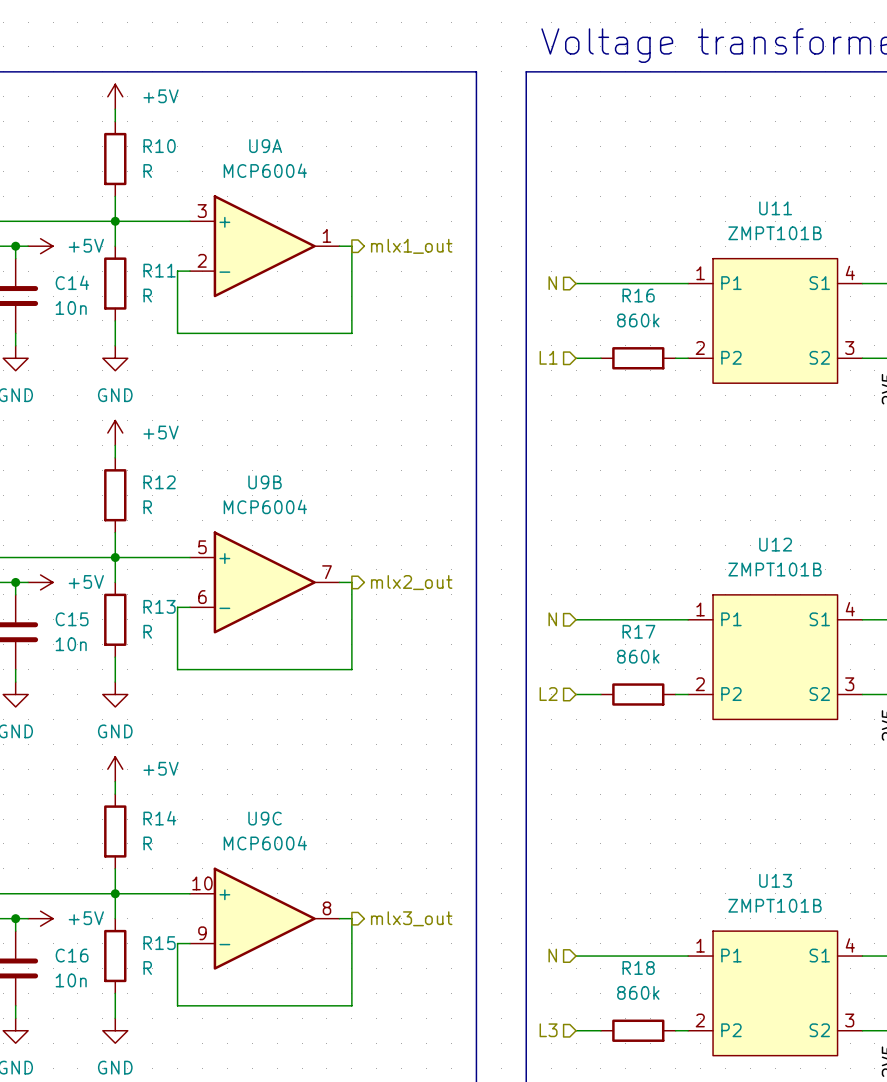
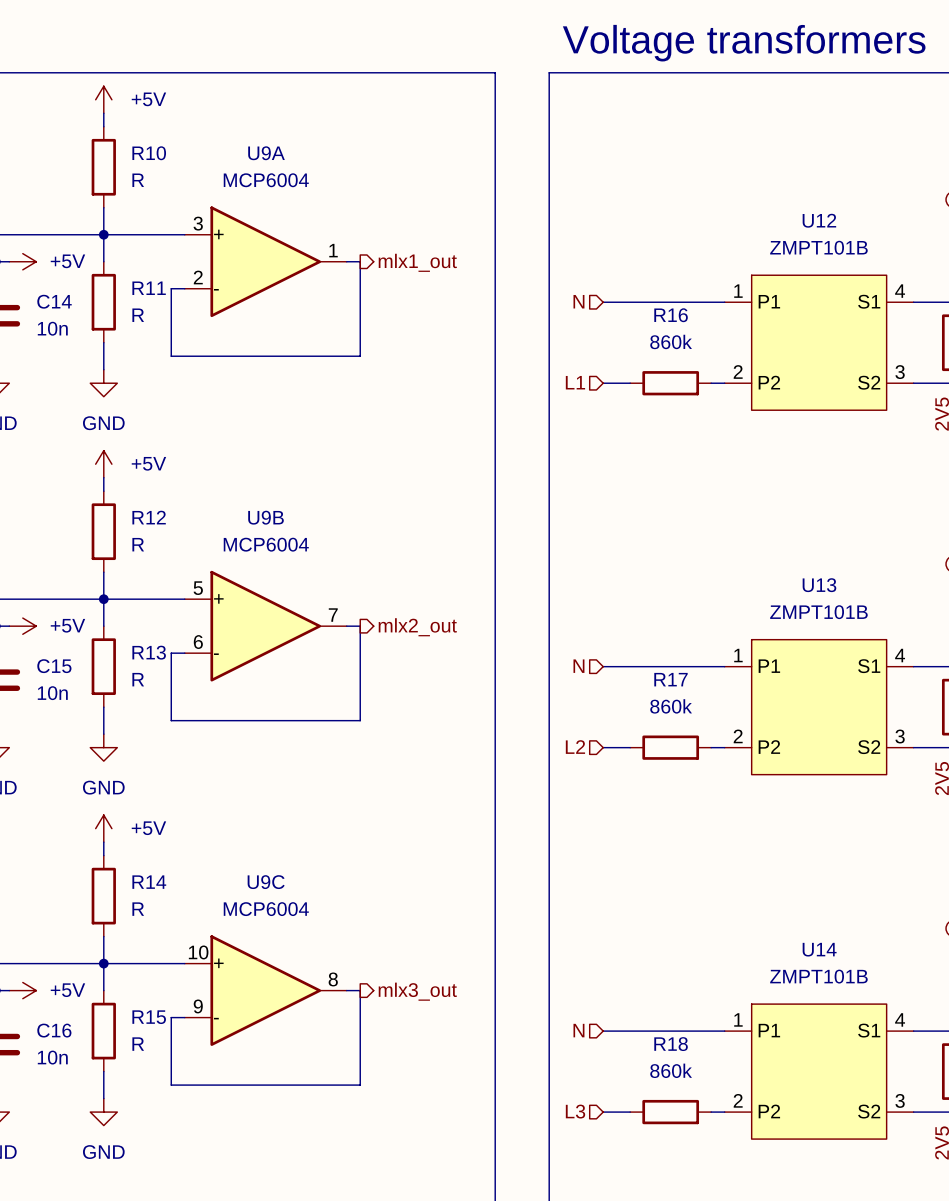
U11 name: U11 (775, 208) -> U12 (819, 220)
U12 name: U12 (775, 544) -> U13 (819, 585)
U13 name: U13 (775, 880) -> U14 (819, 949)

